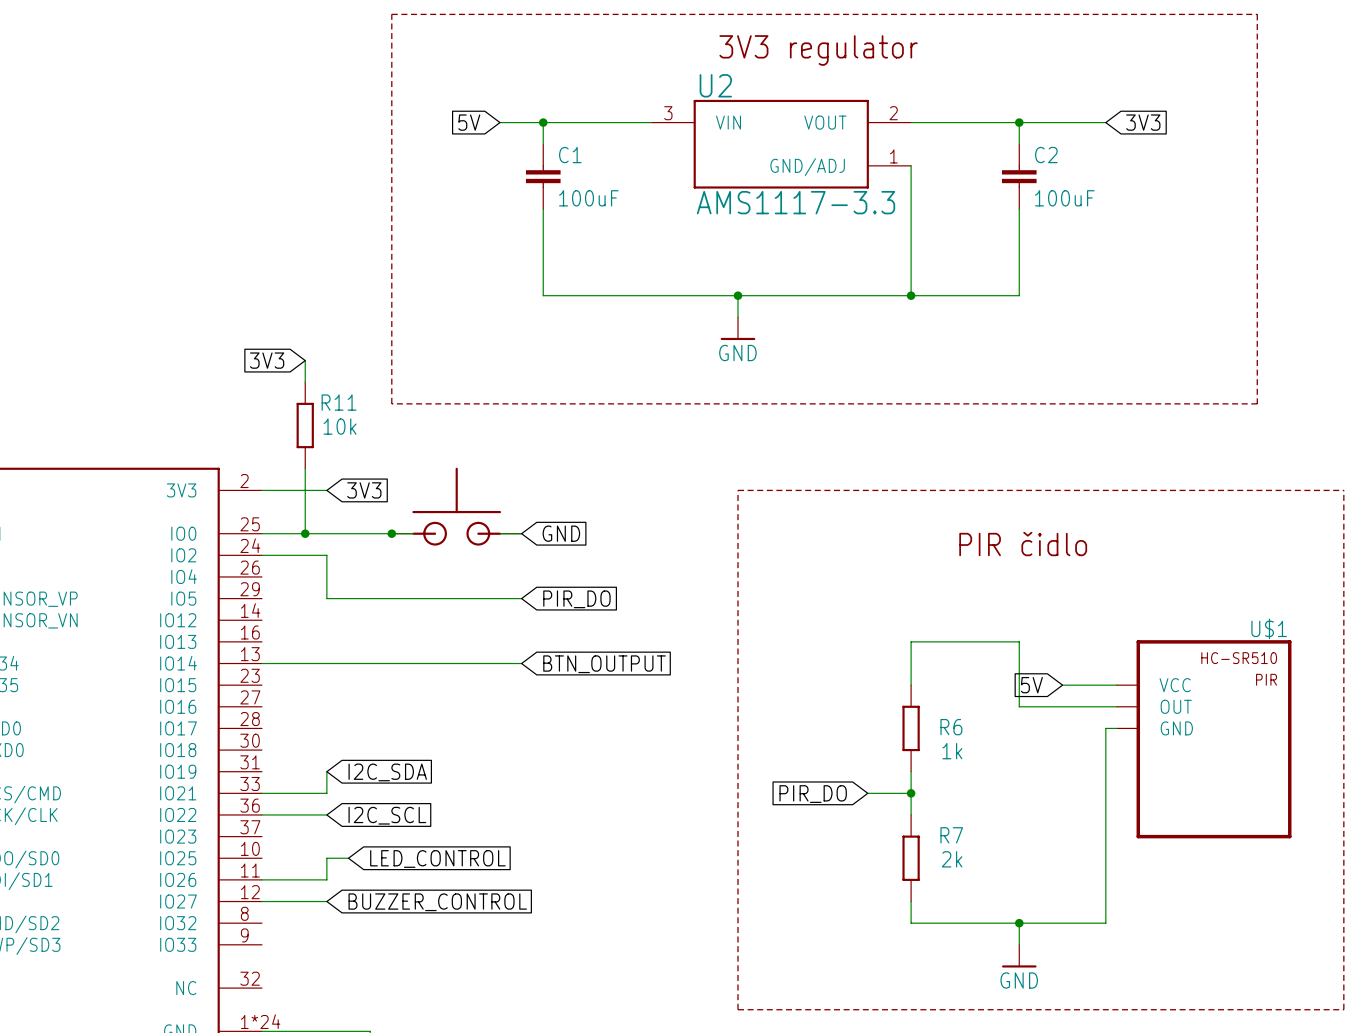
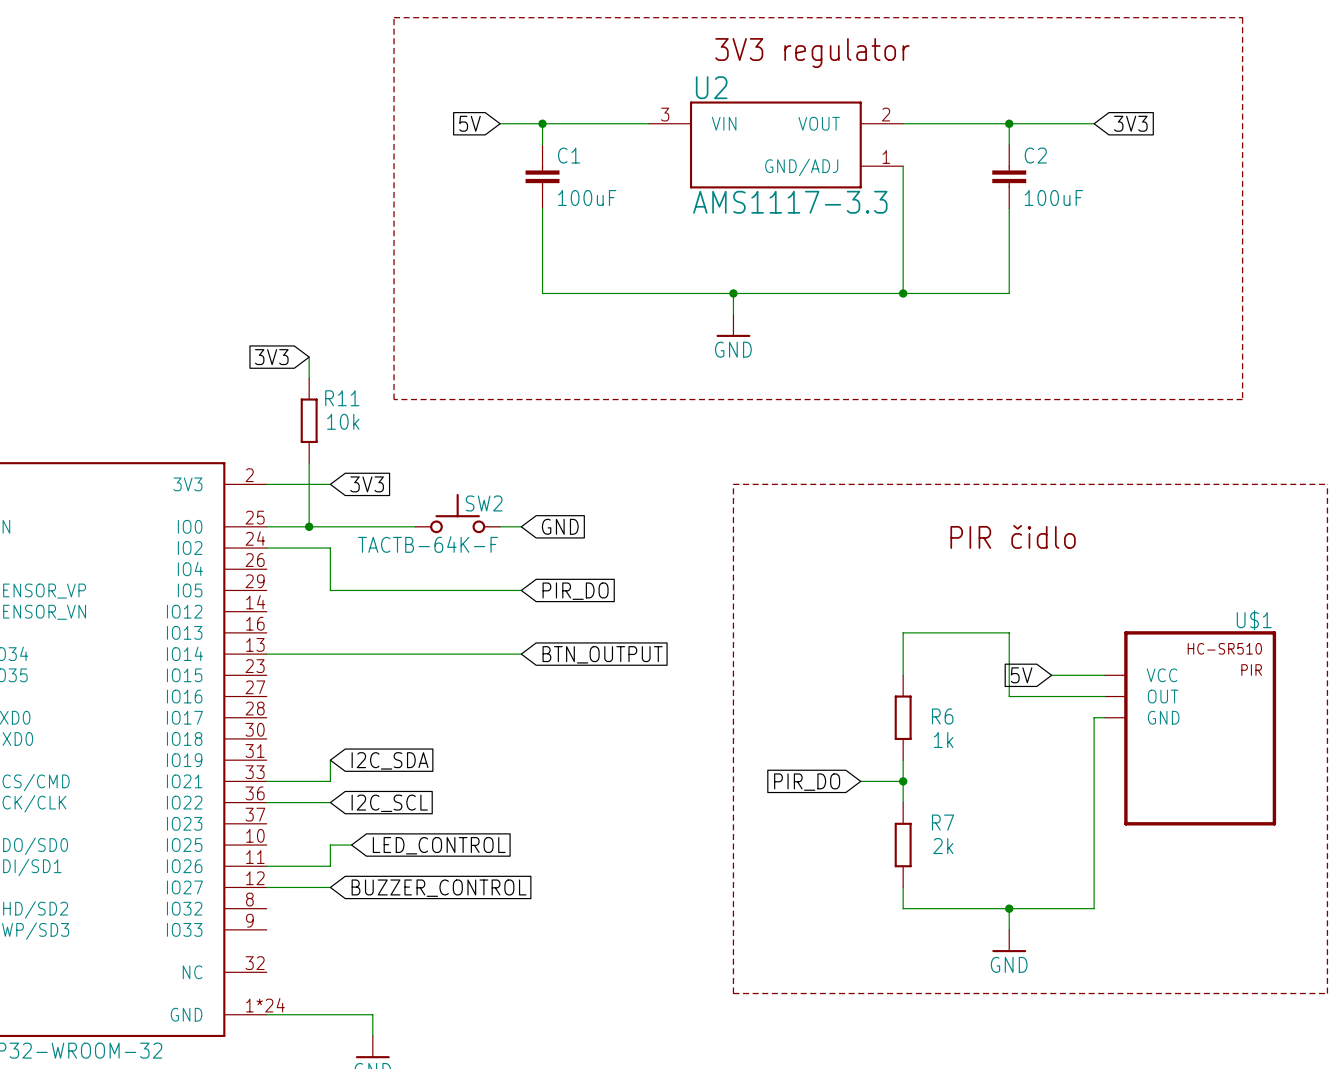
part: (456, 506) -> none
SW2: none -> TACTB-64K-F (457, 513)
junction: (391, 533) -> none

